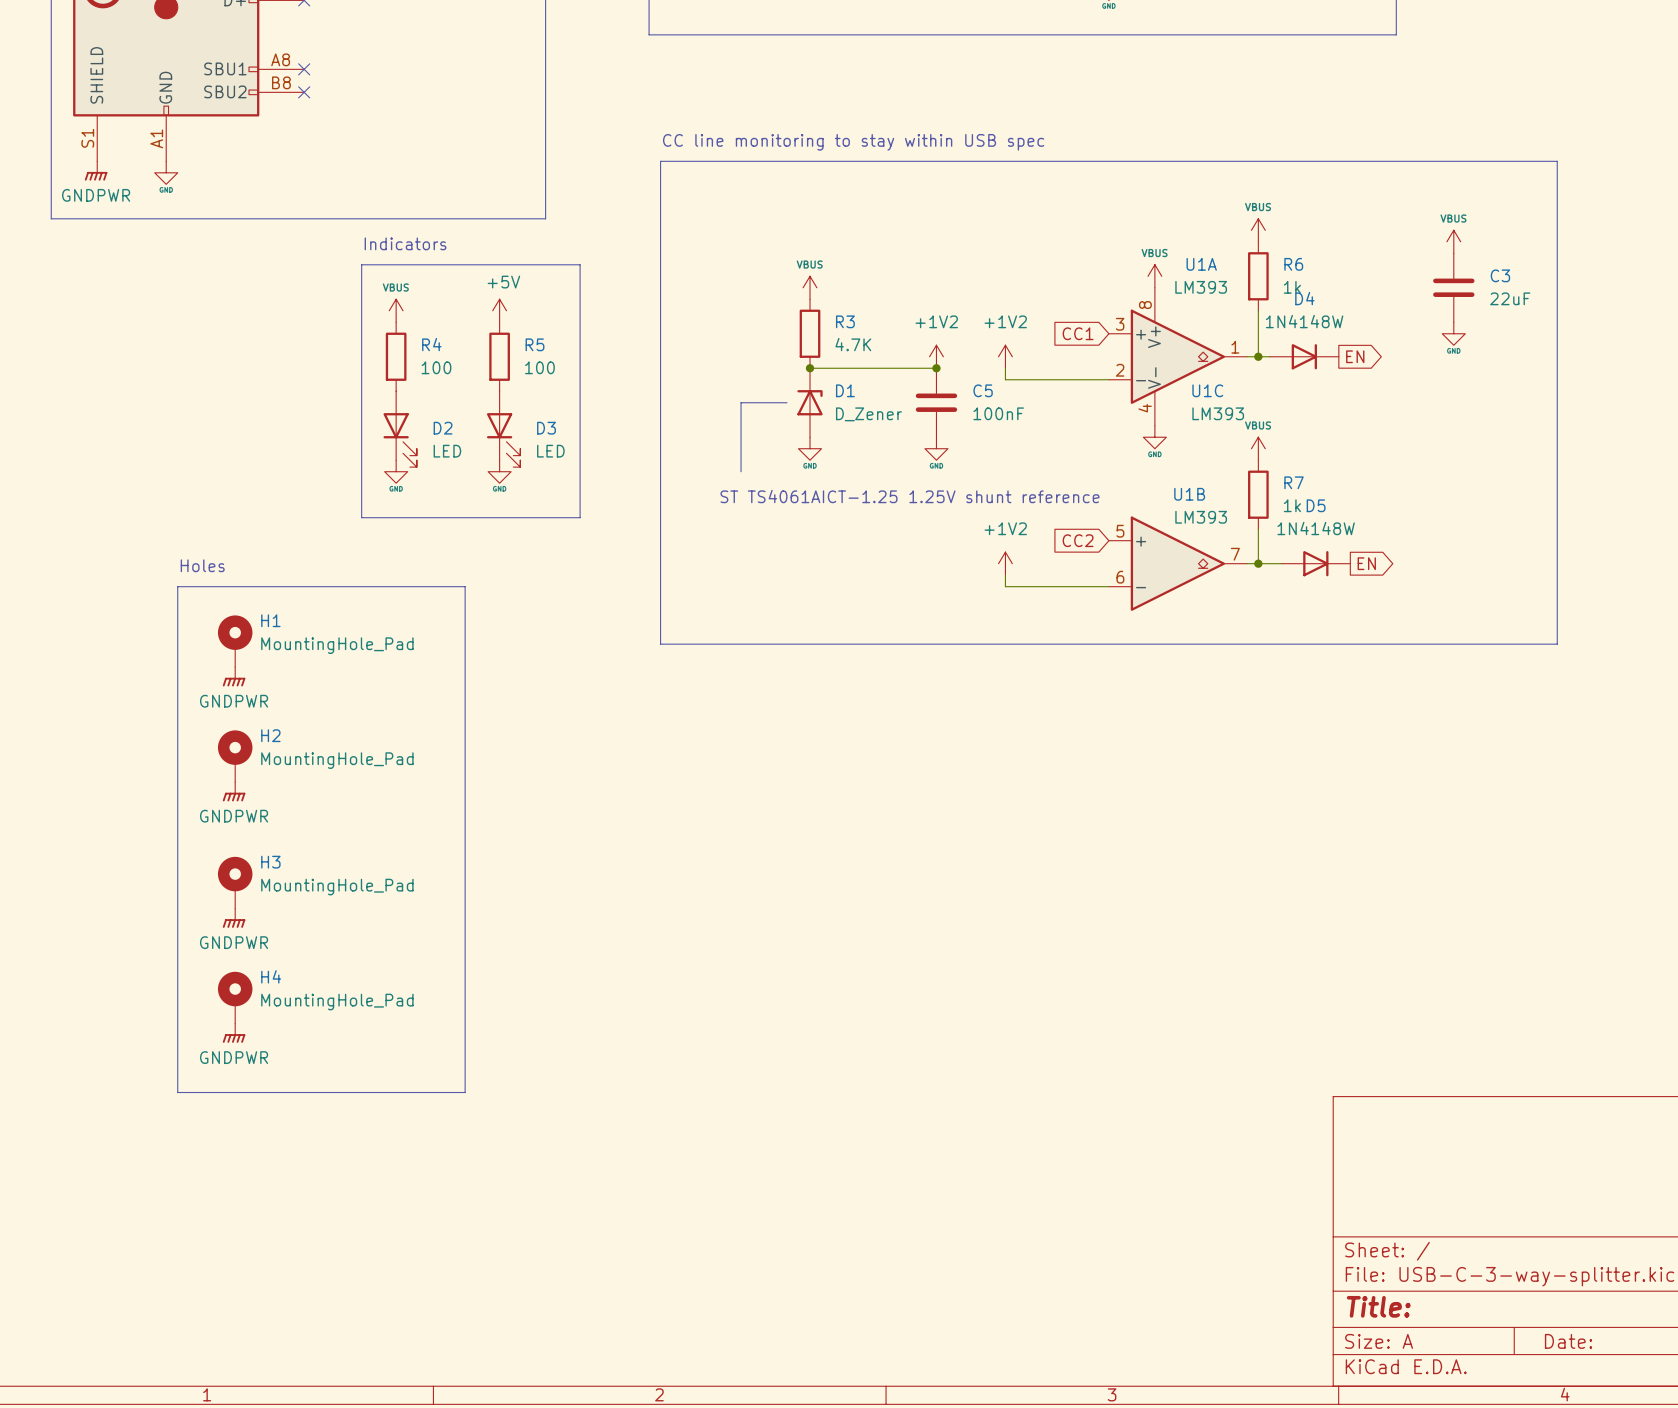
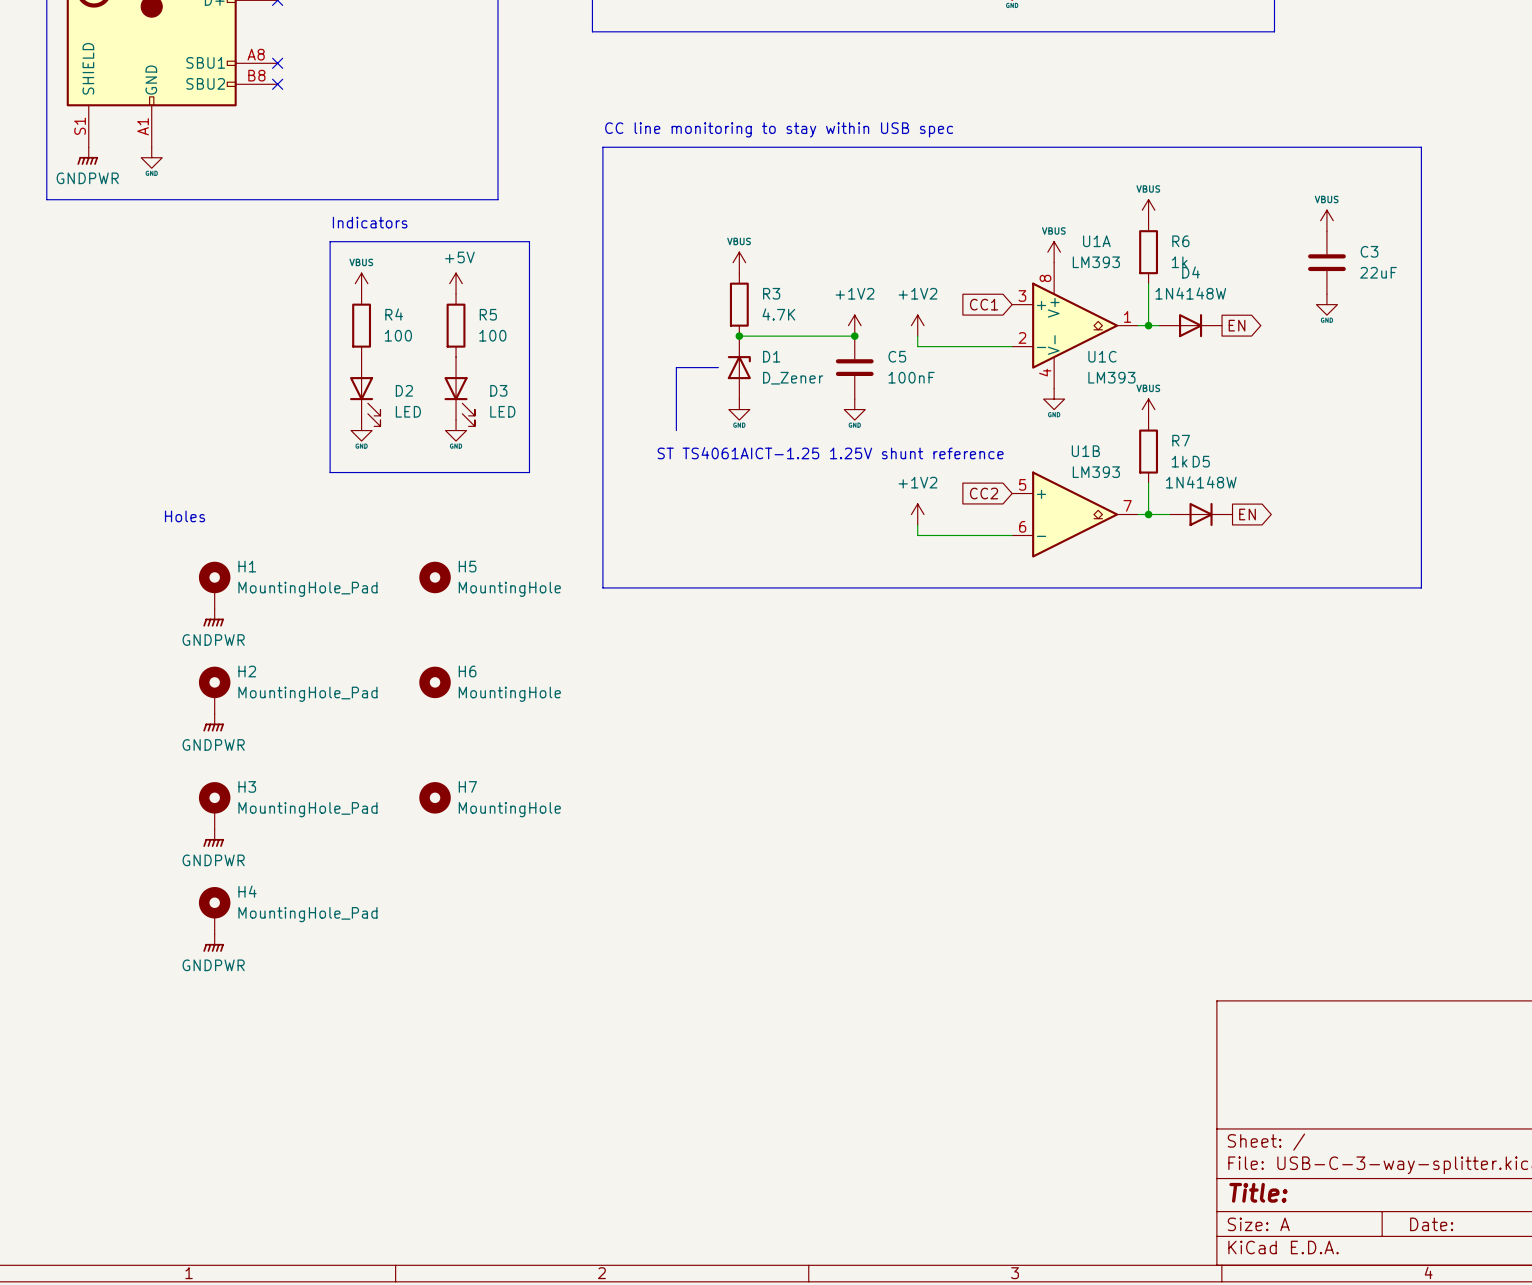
line: (177, 586) (465, 586) (465, 1092) (177, 1092) (177, 586) -> none
H5: none -> MountingHole (435, 577)
H6: none -> MountingHole (435, 682)
H7: none -> MountingHole (435, 797)

